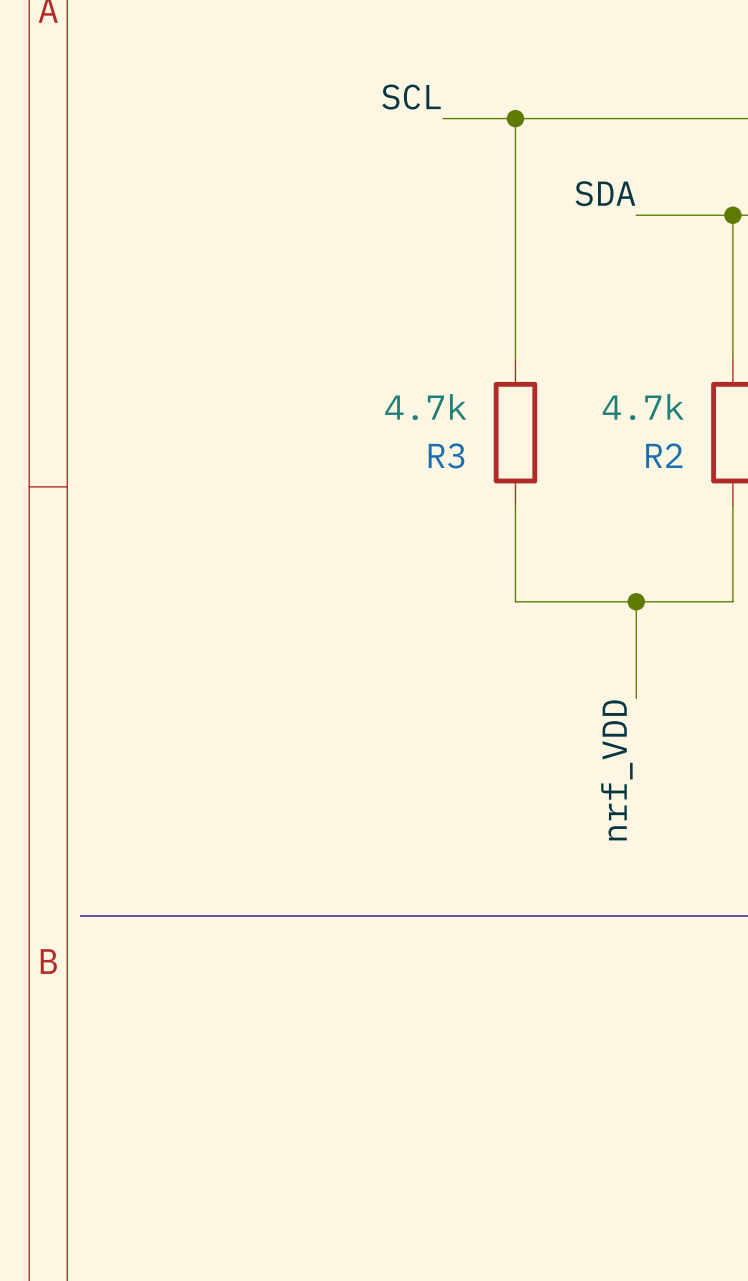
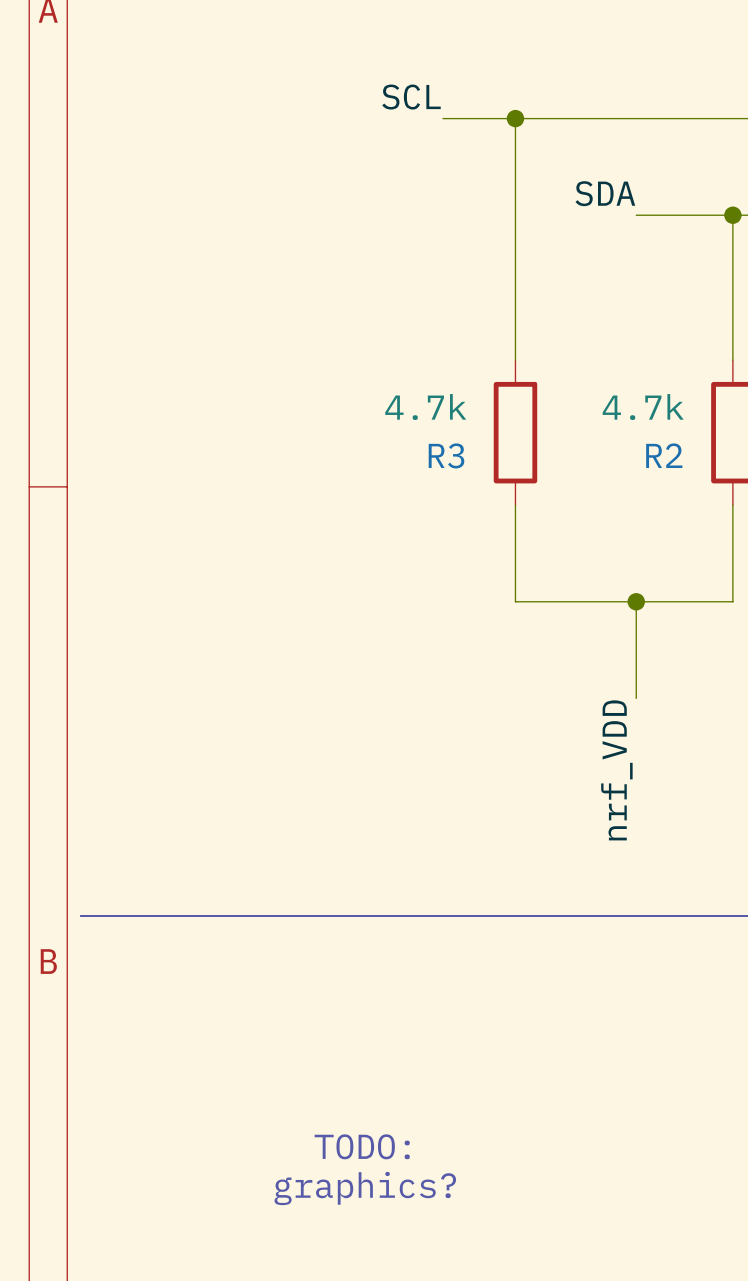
text: none -> TODO: (362, 1146)
text: none -> graphics? (365, 1188)

